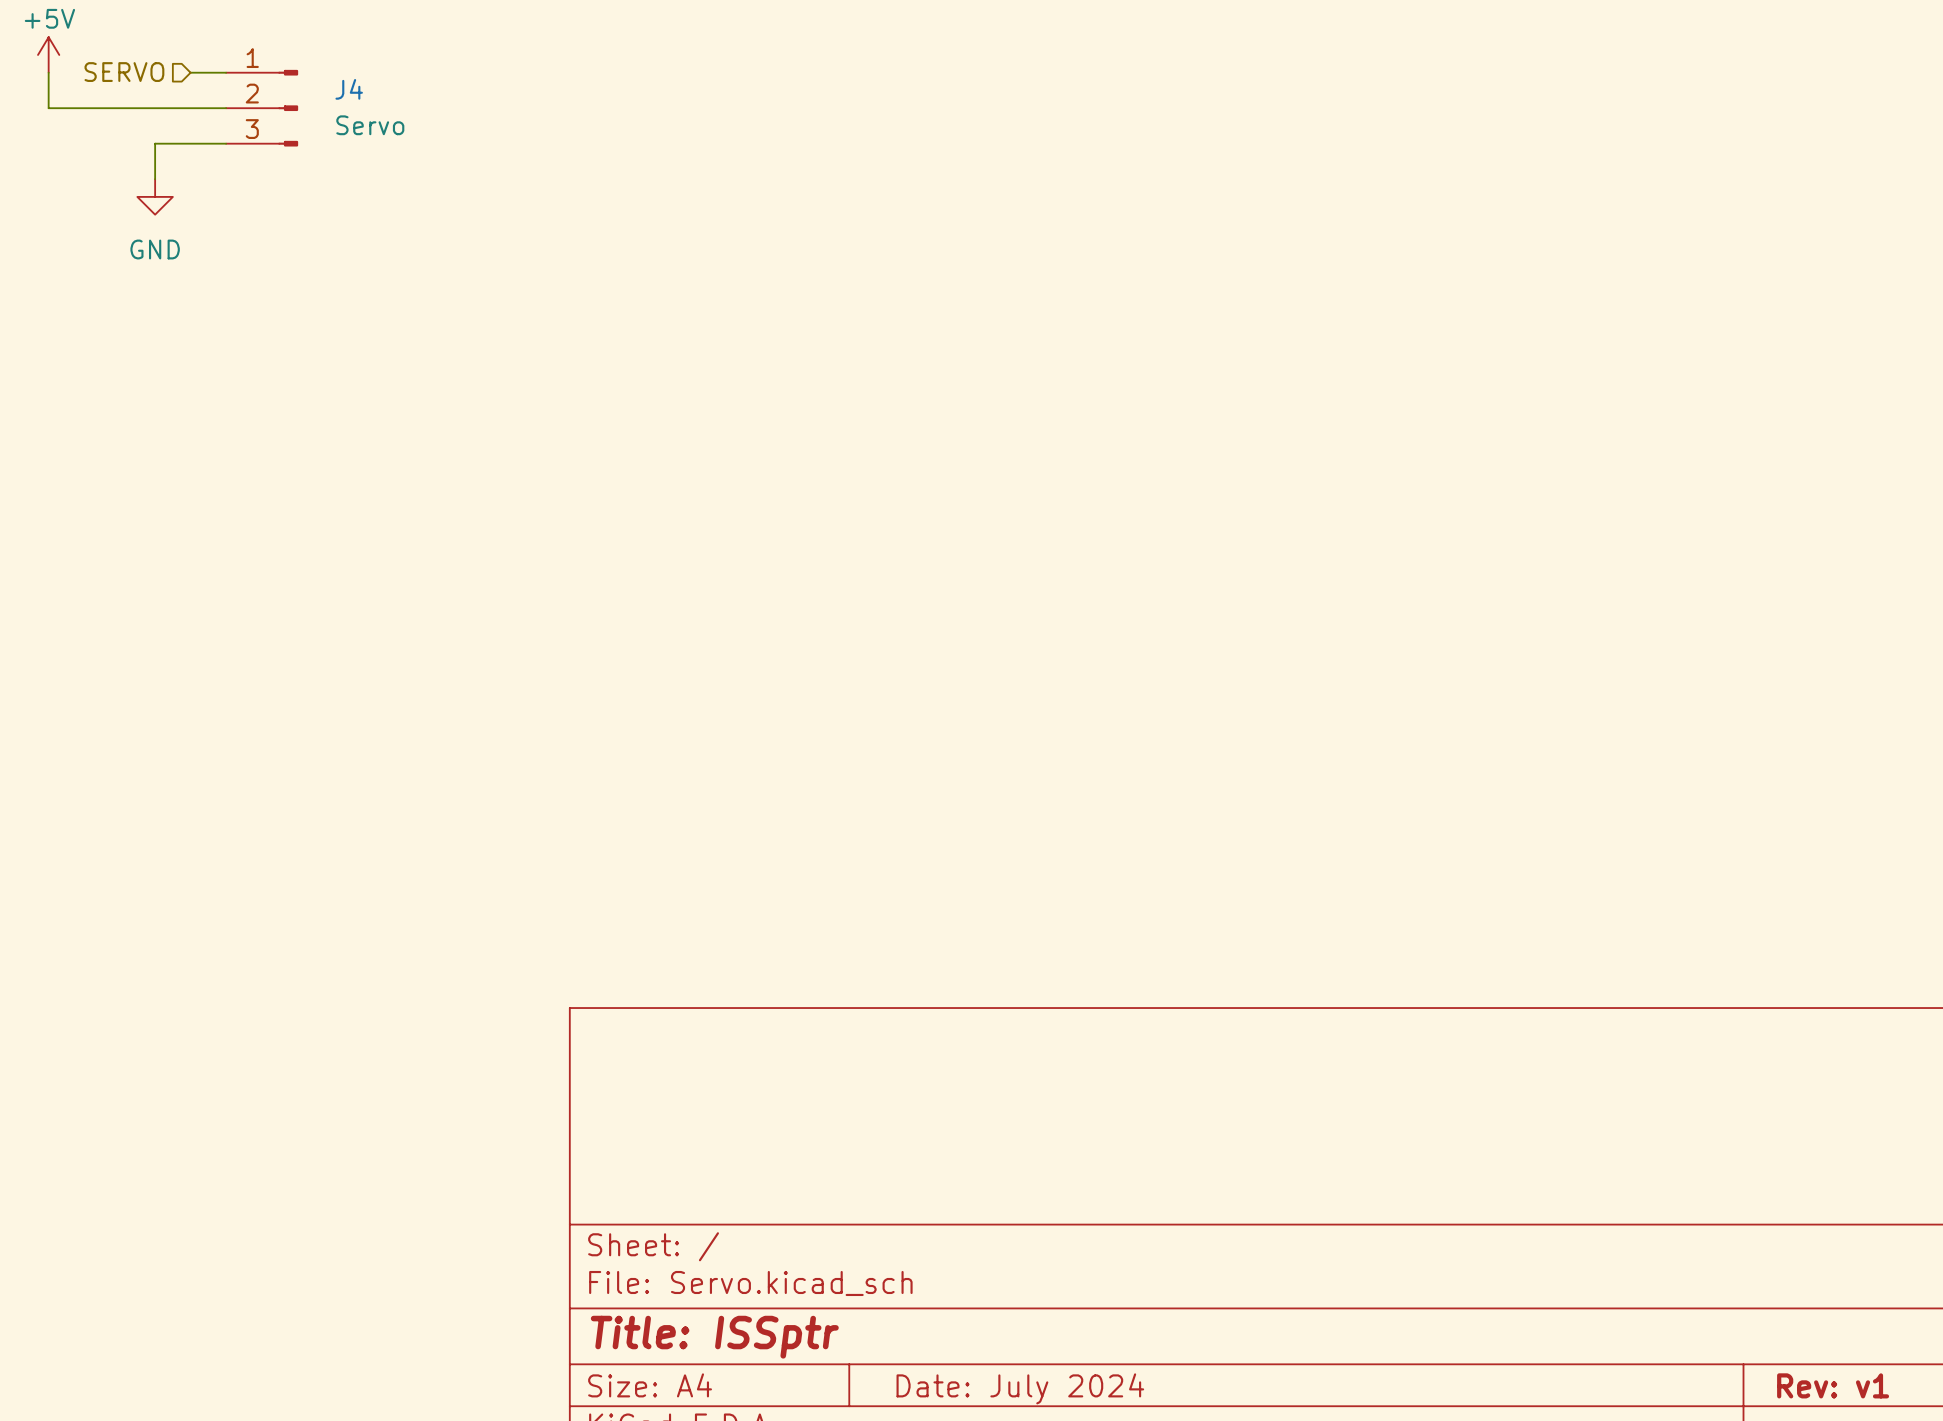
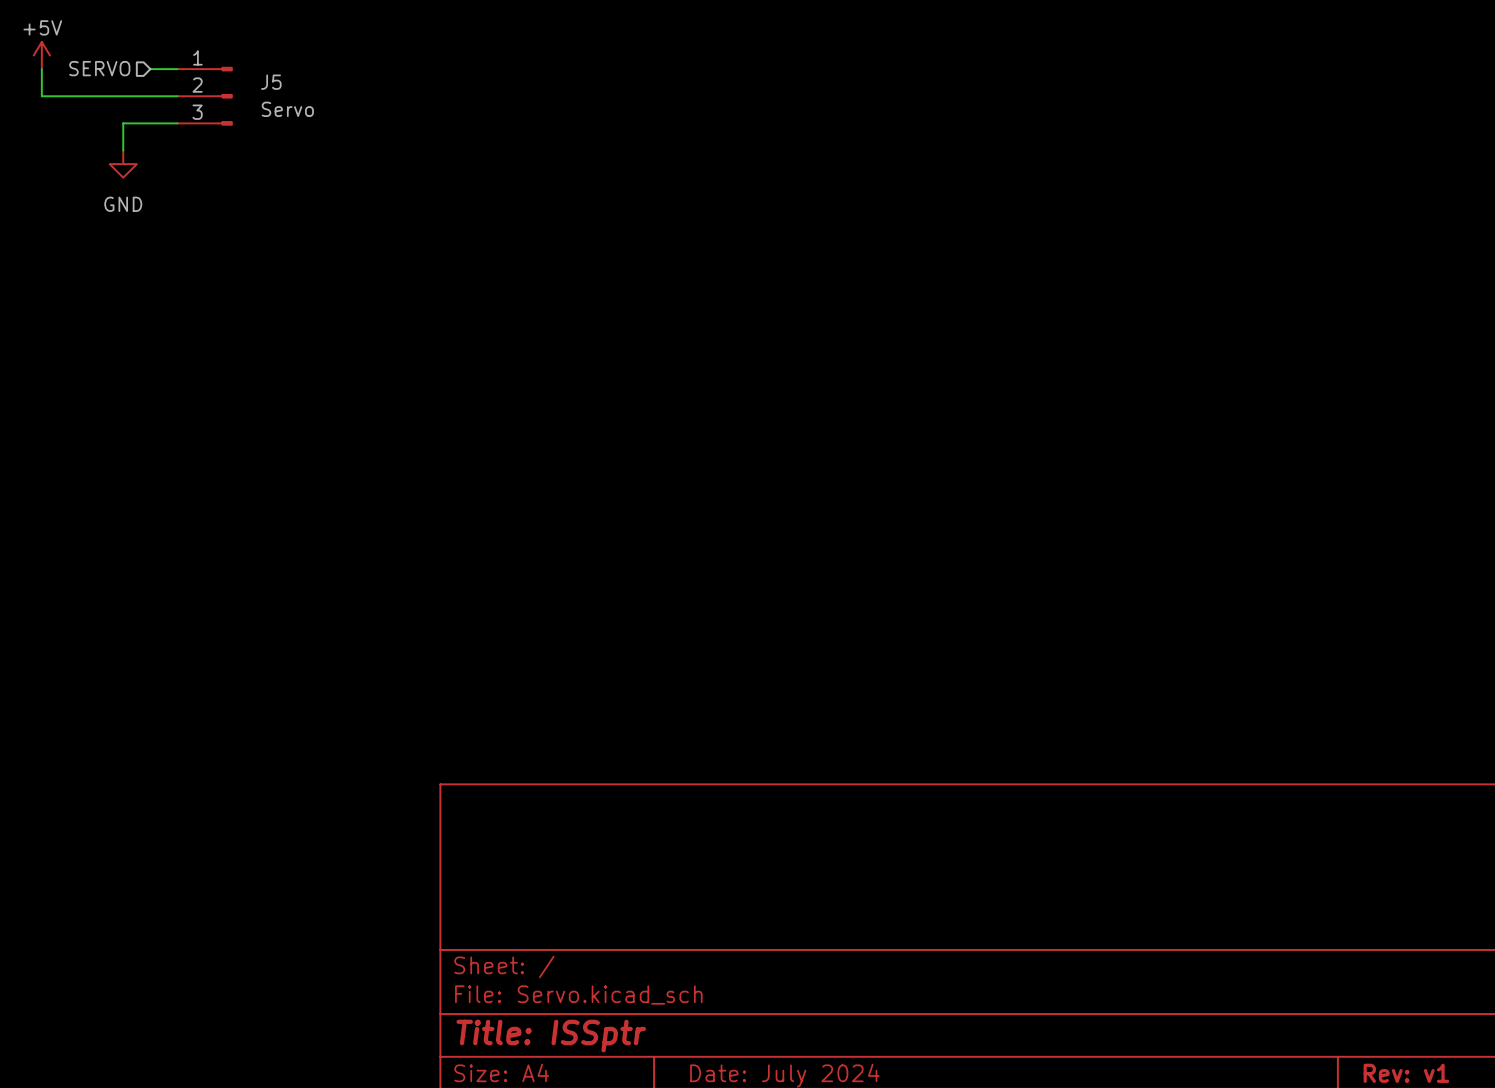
J4 name: J4 (349, 89) -> J5 (271, 82)

